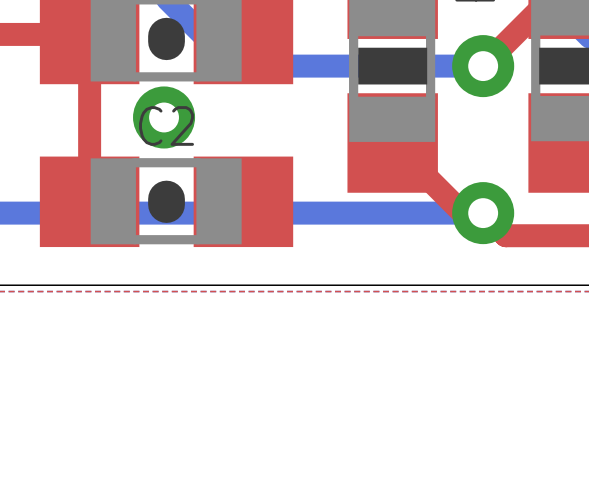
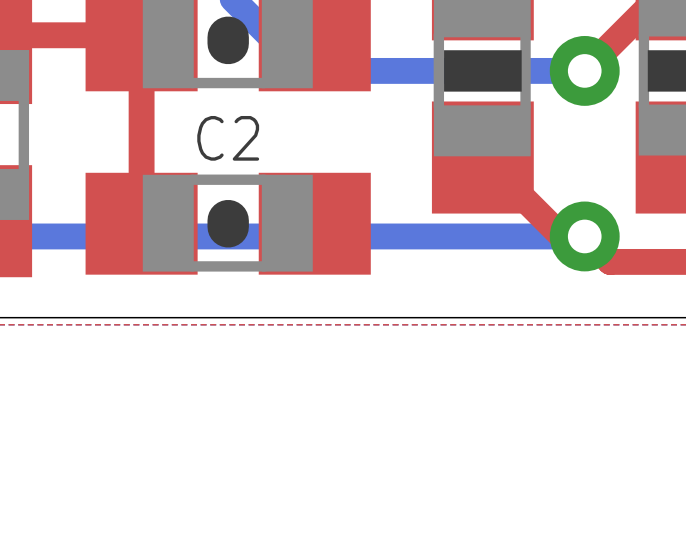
via: (164, 117) -> none

